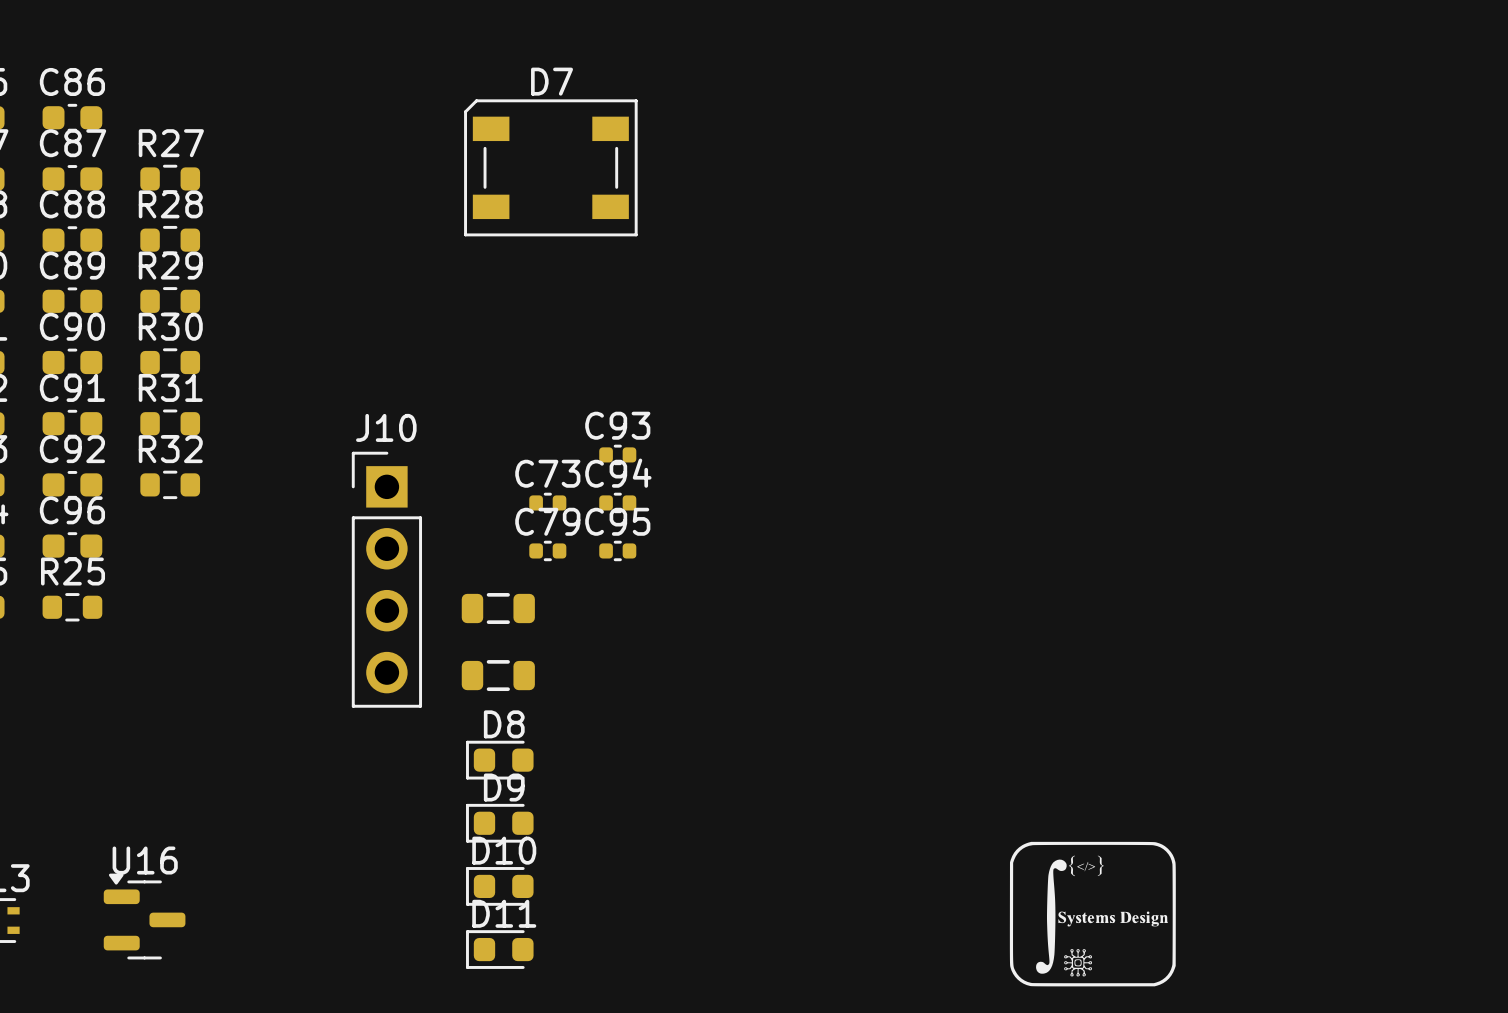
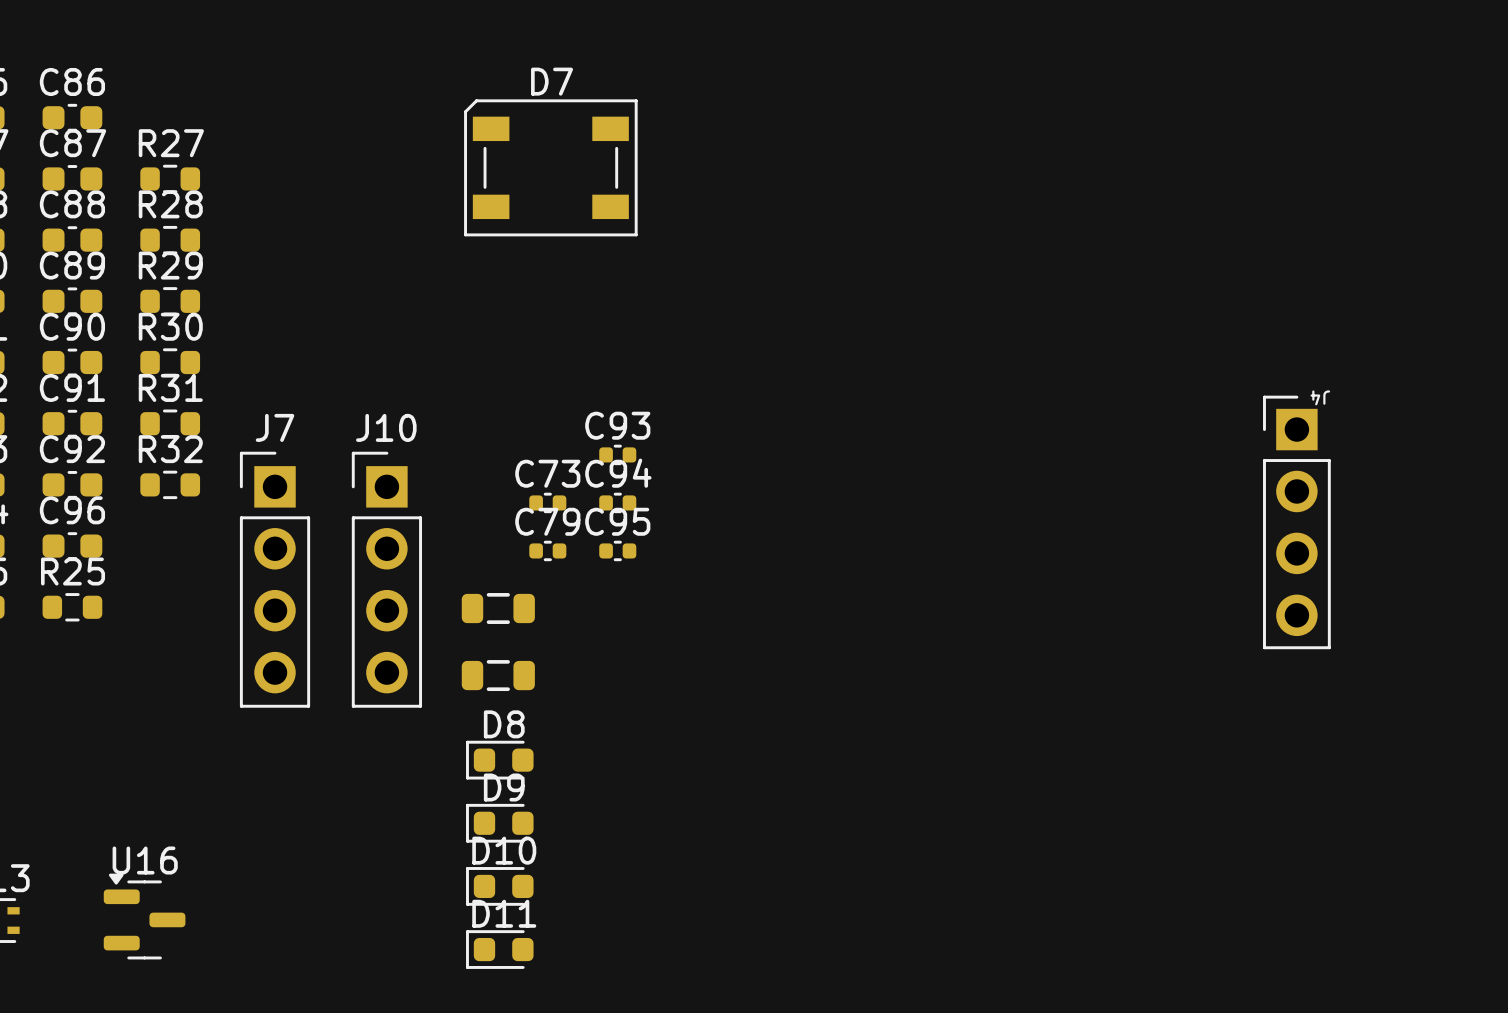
J4: none -> (1296, 522)
J7: none -> (275, 579)
drawing: [1009, 841, 1176, 987] -> none

